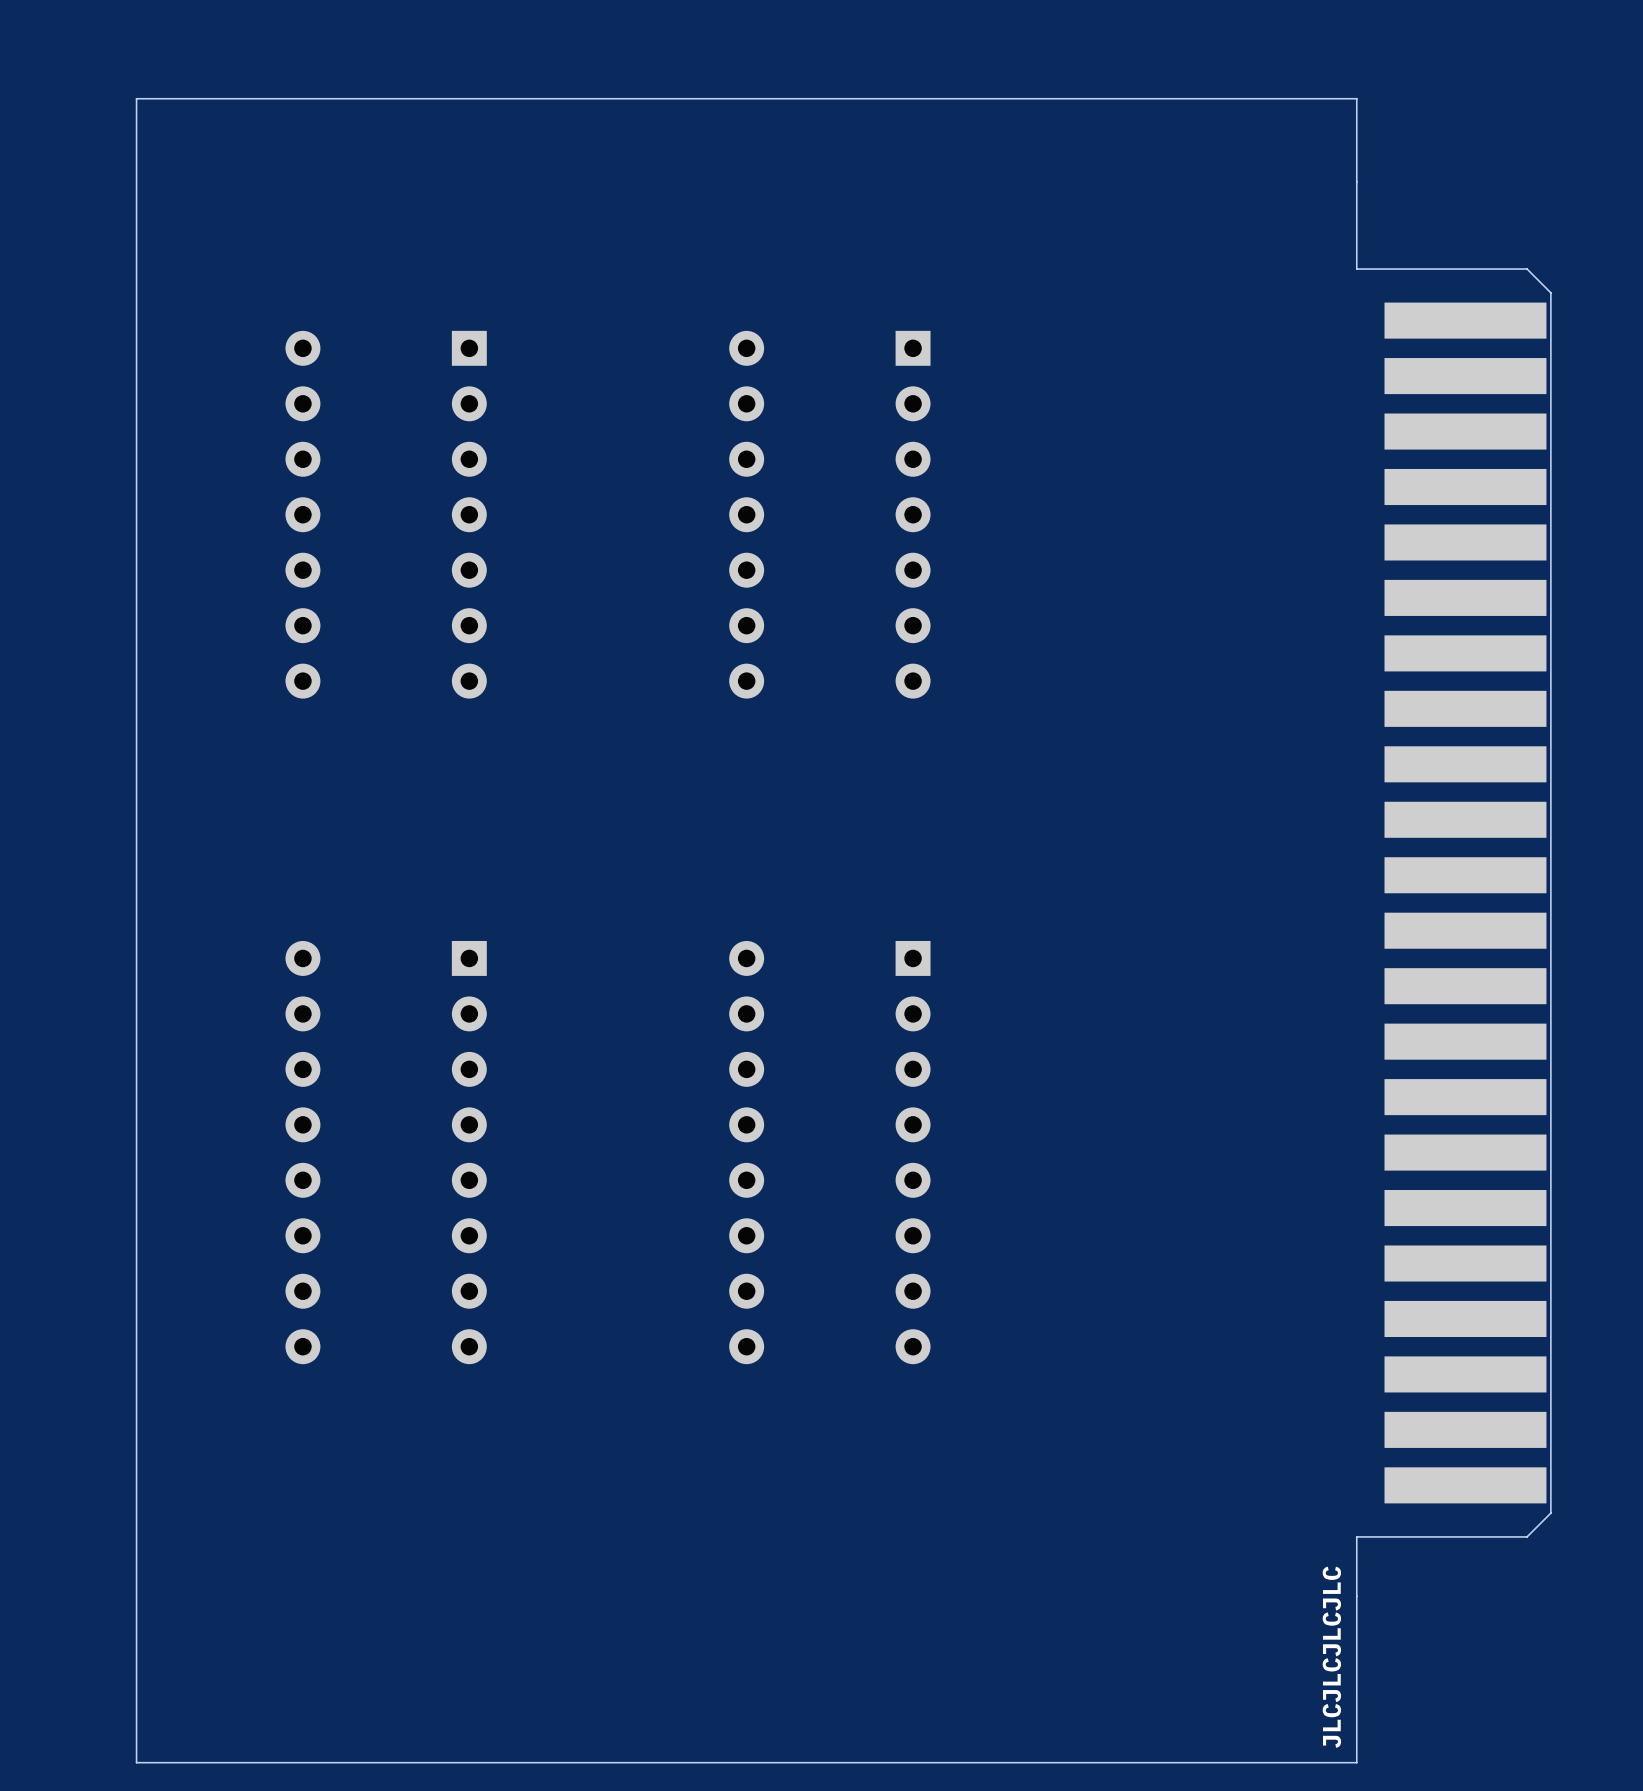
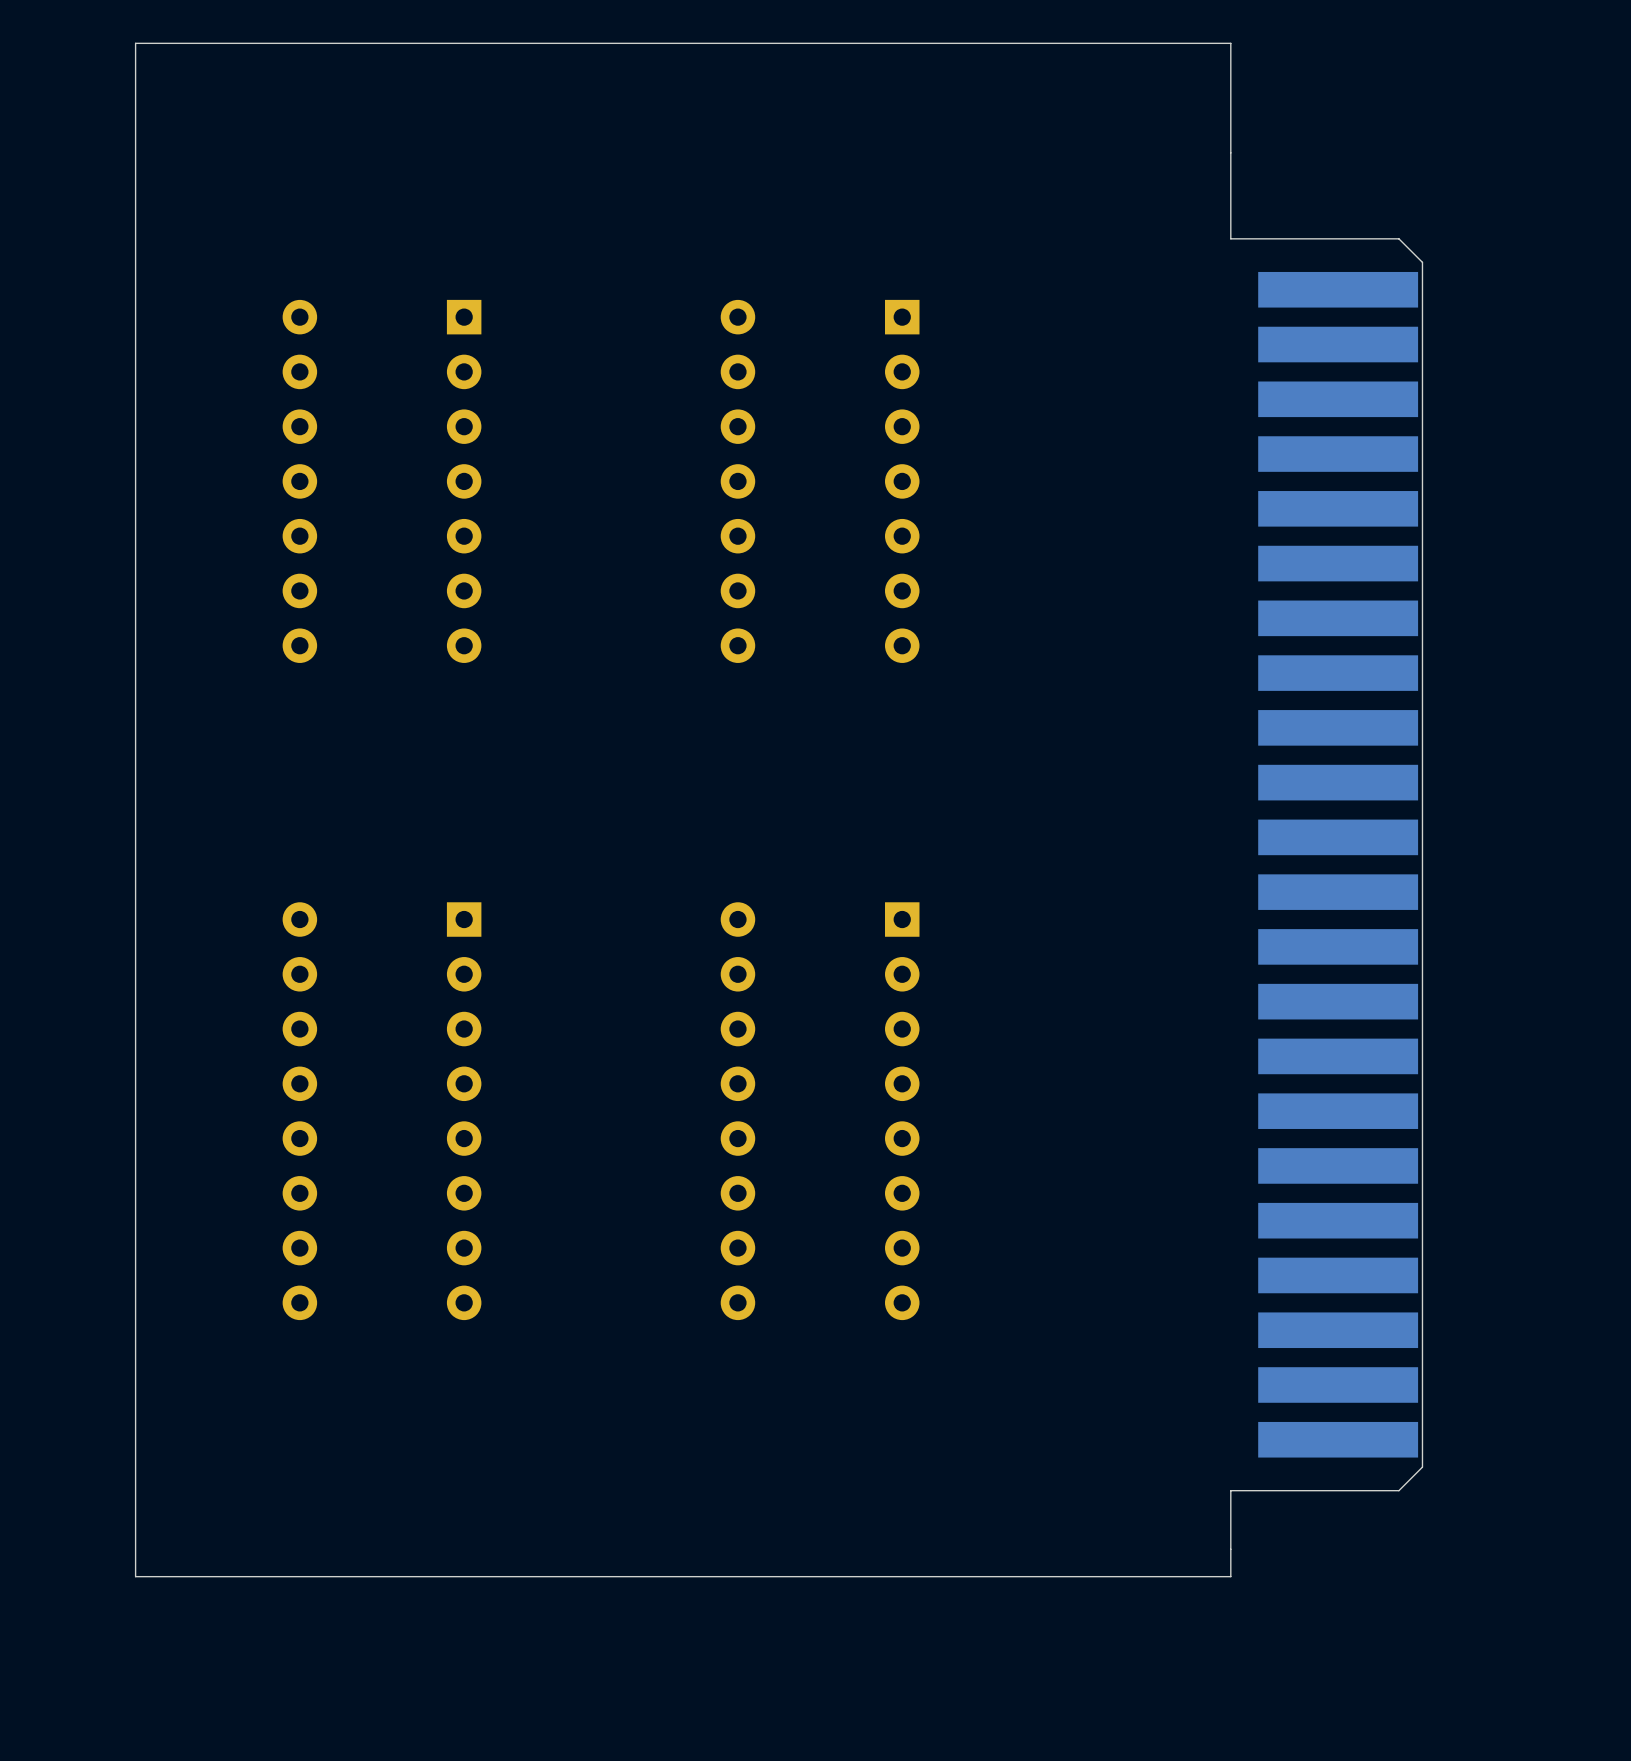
board edge: (136, 98) (1356, 98) (1356, 181) -> (135, 70) (135, 43) (1230, 43) (1230, 152)
part position: (1453, 889) -> (1326, 851)
board edge: (1356, 1596) (1356, 1762) (136, 1762) (136, 1624) -> (1230, 1549) (1230, 1576) (135, 1576)
text: JLCJLCJLCJLC (1331, 1657) -> none

